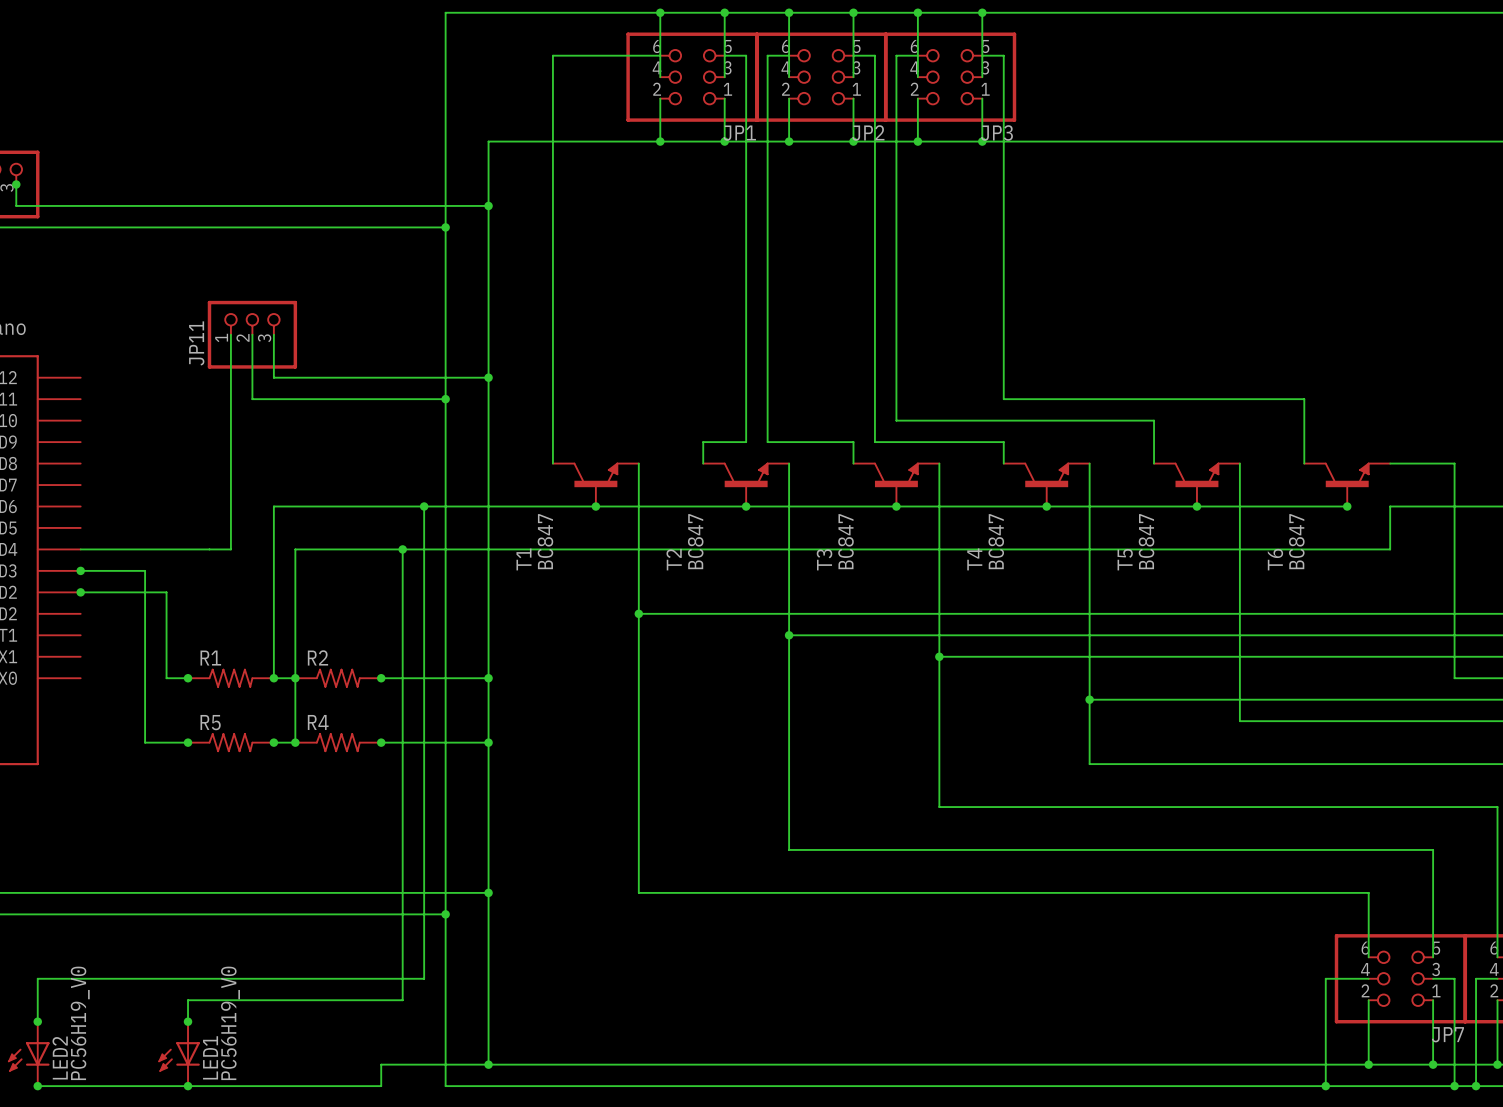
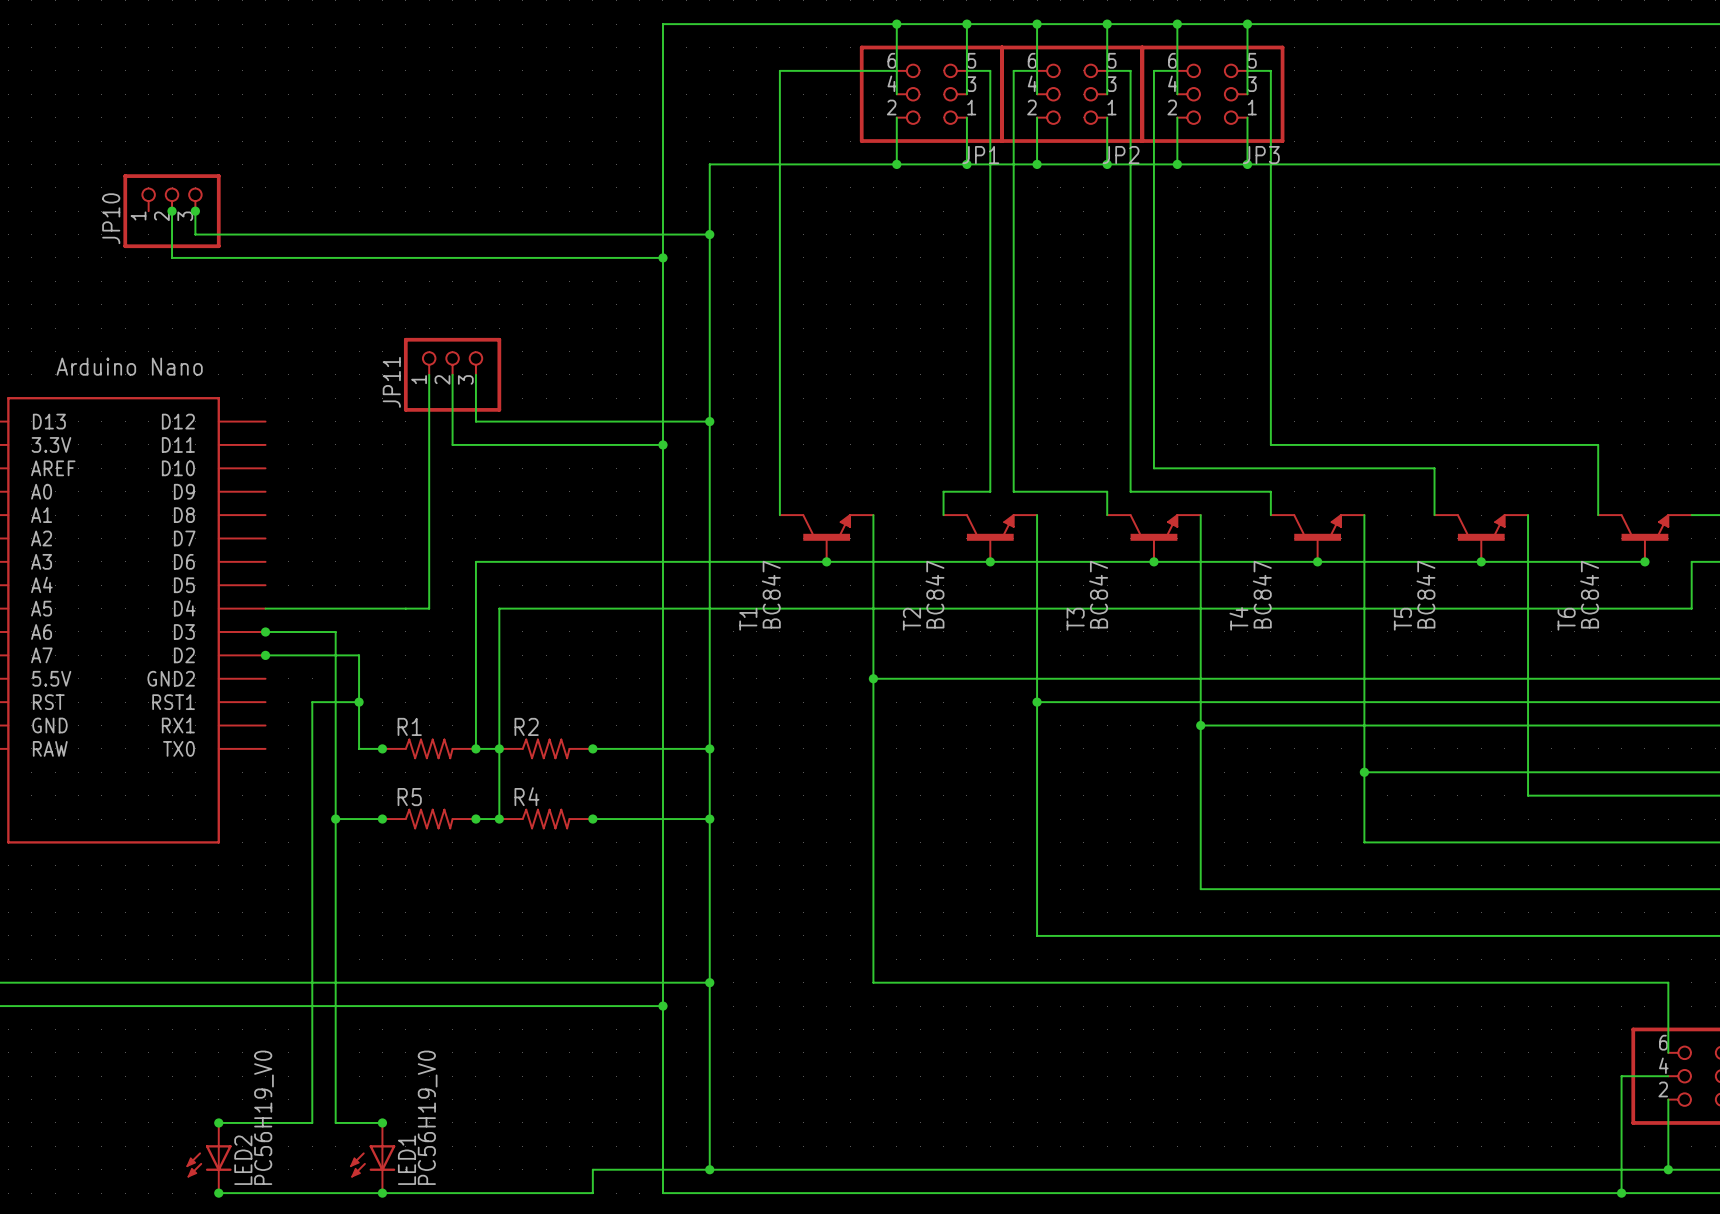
wire: (424, 506) (424, 978) (37, 978) (37, 1021) -> (359, 702) (312, 702) (312, 1122) (218, 1122)
junction: (424, 506) -> none
wire: (402, 549) (402, 1000) (188, 1000) (188, 1021) -> (335, 819) (335, 1122) (382, 1122)
junction: (402, 549) -> none
junction: none -> (359, 702)
junction: none -> (335, 819)

